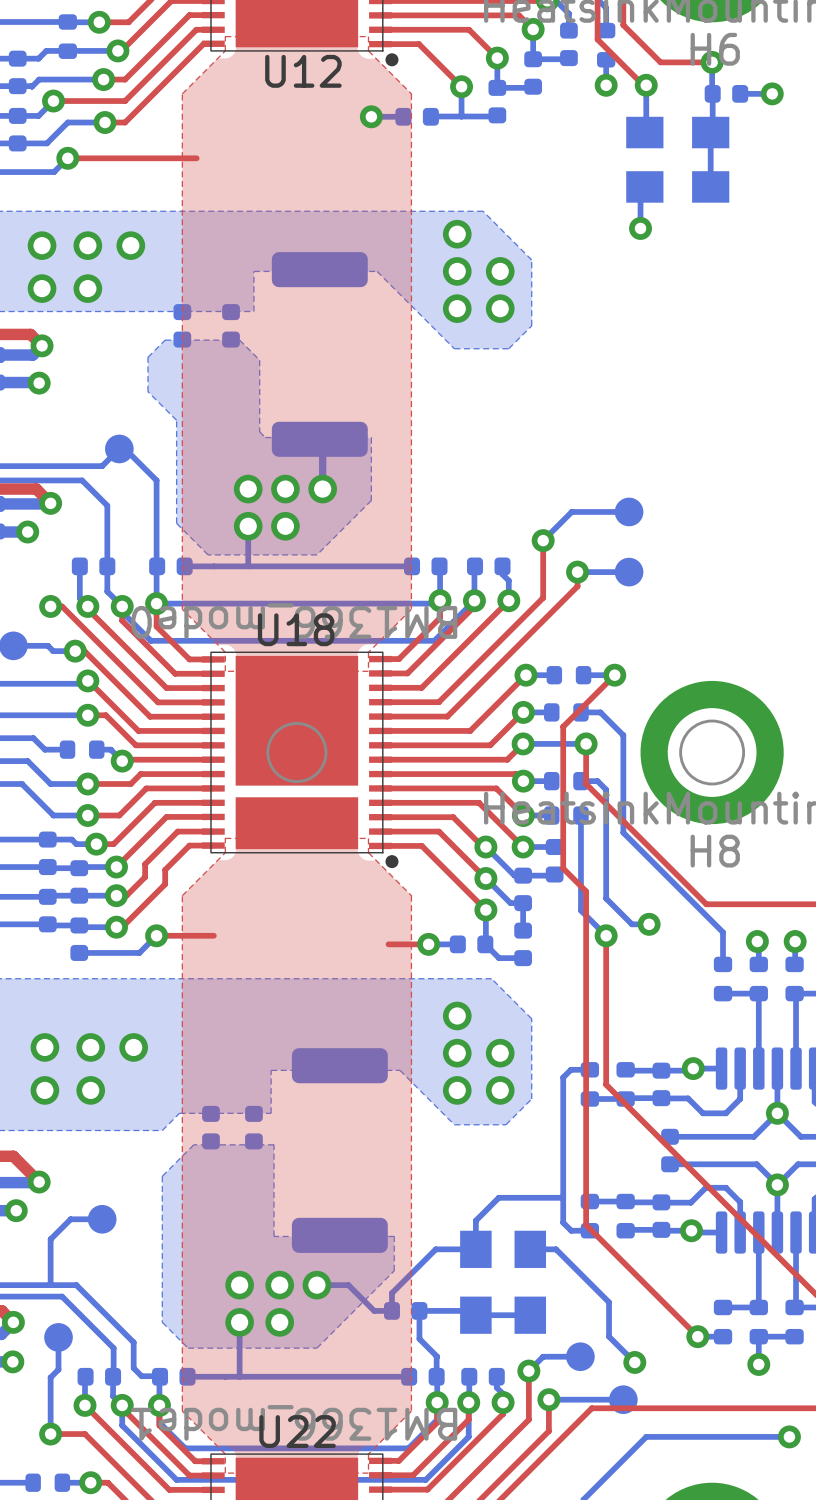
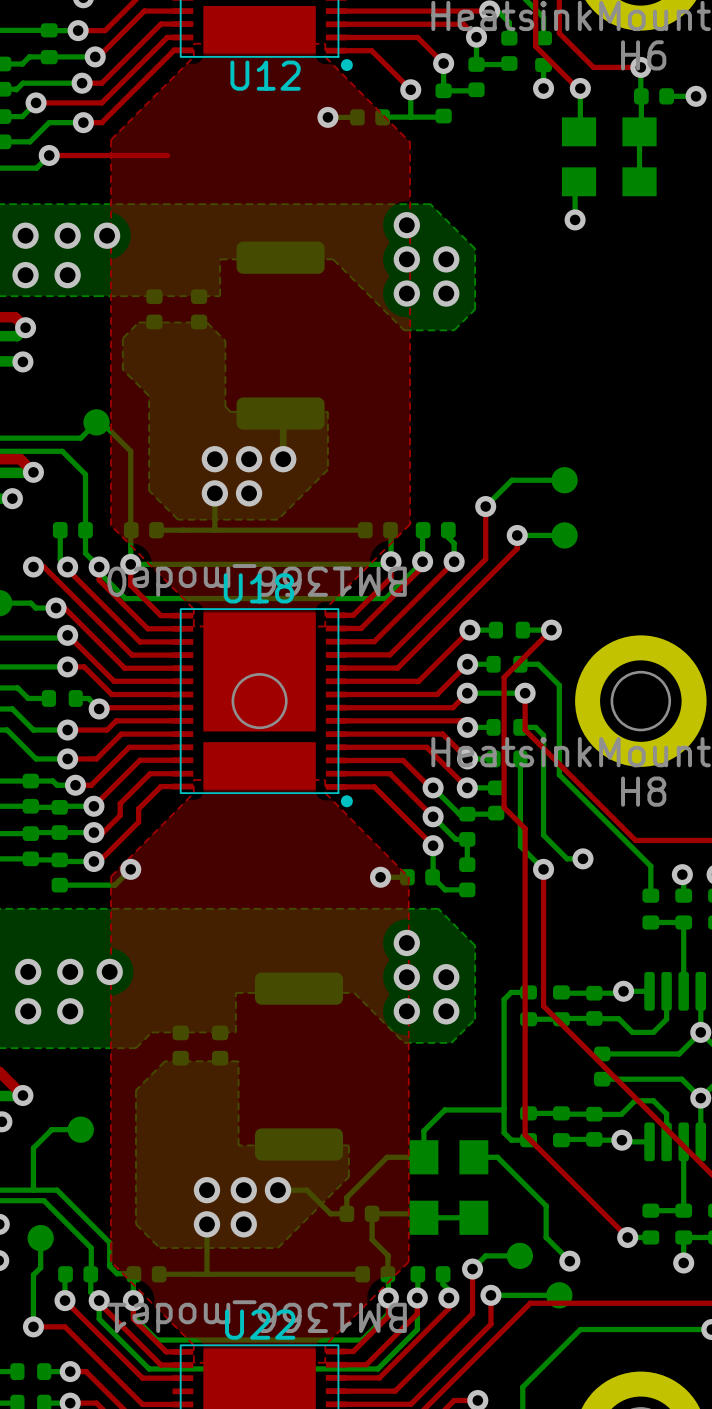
top zone outline: (368, 50) (411, 93) (411, 609) -> (325, 56) (410, 142) (410, 524) (364, 569)
top zone outline: (182, 93) (182, 609) (225, 652) -> (154, 96) (111, 139) (111, 525) (193, 609)
top zone outline: (225, 852) (182, 895) (182, 1411) (225, 1454) -> (193, 793) (111, 876) (111, 1261) (193, 1345)
top zone outline: (368, 852) (411, 895) (411, 1411) -> (325, 793) (408, 877) (408, 1261) (364, 1305)
top track: (156, 935) (213, 935) -> none
top track: (388, 944) (428, 944) -> none

